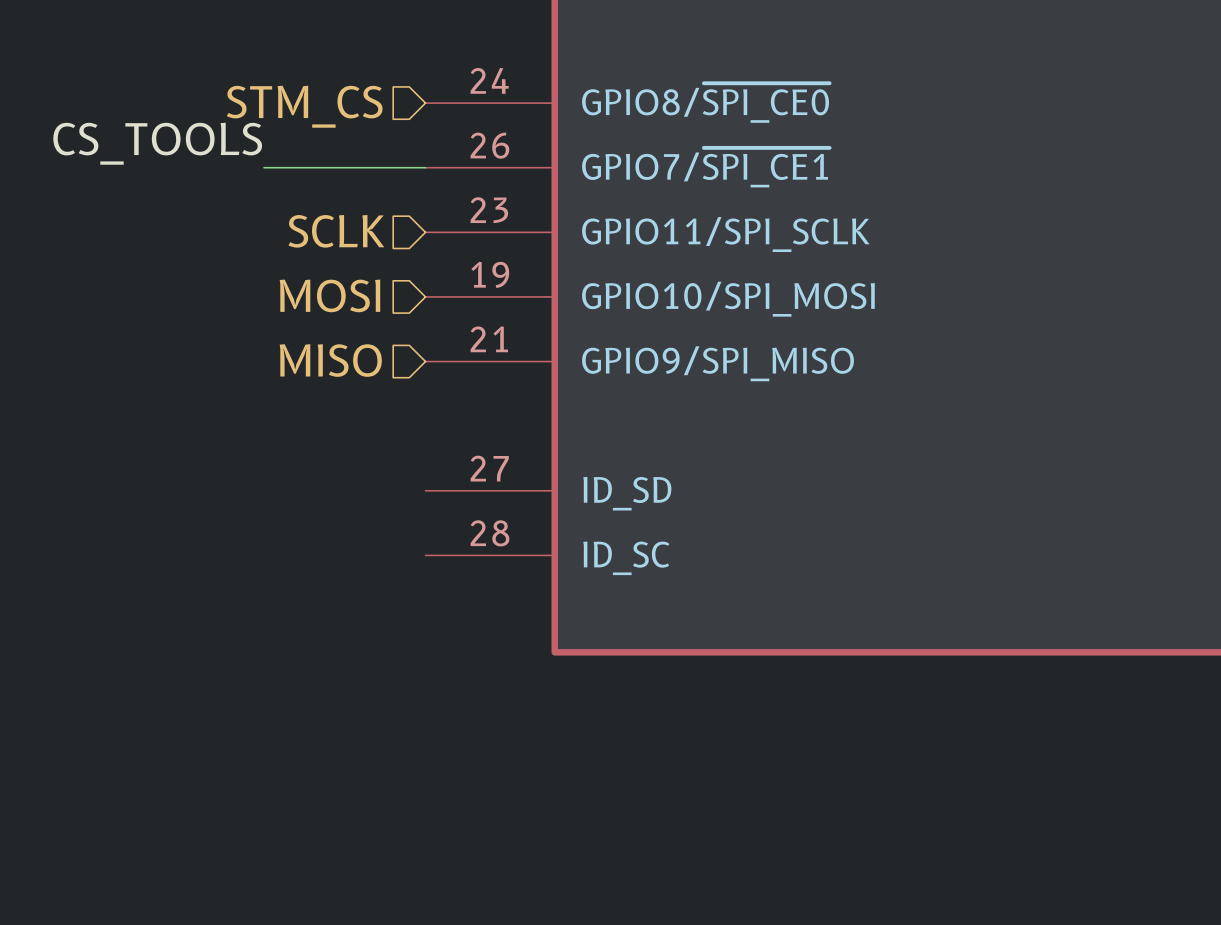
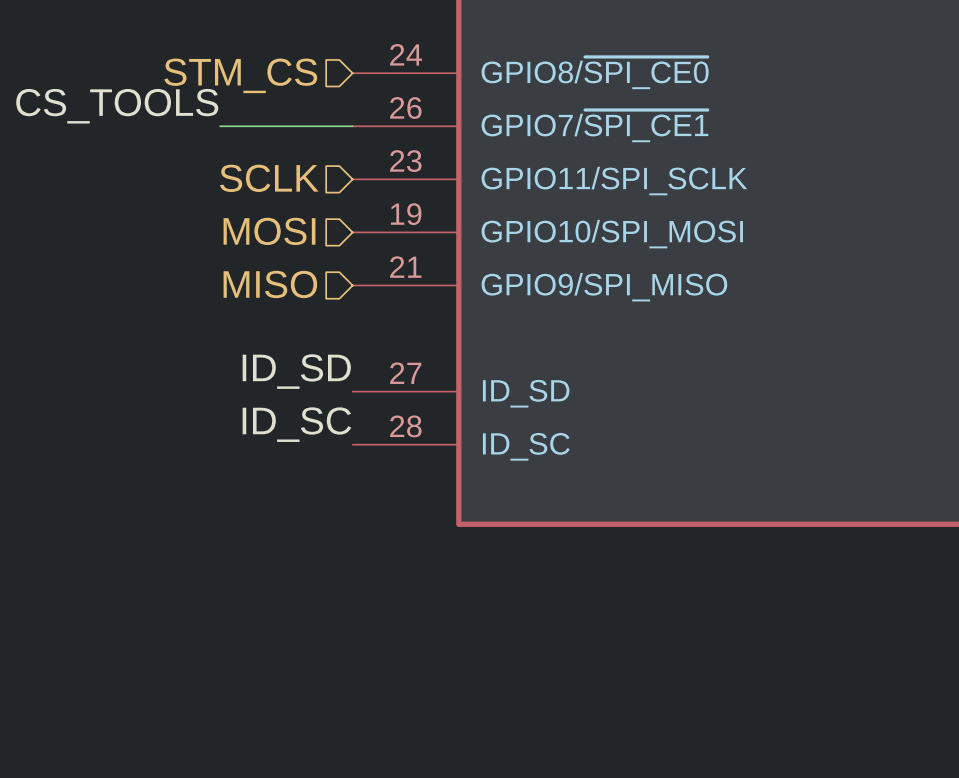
label: none -> ID_SD (296, 371)
label: none -> ID_SC (296, 424)

